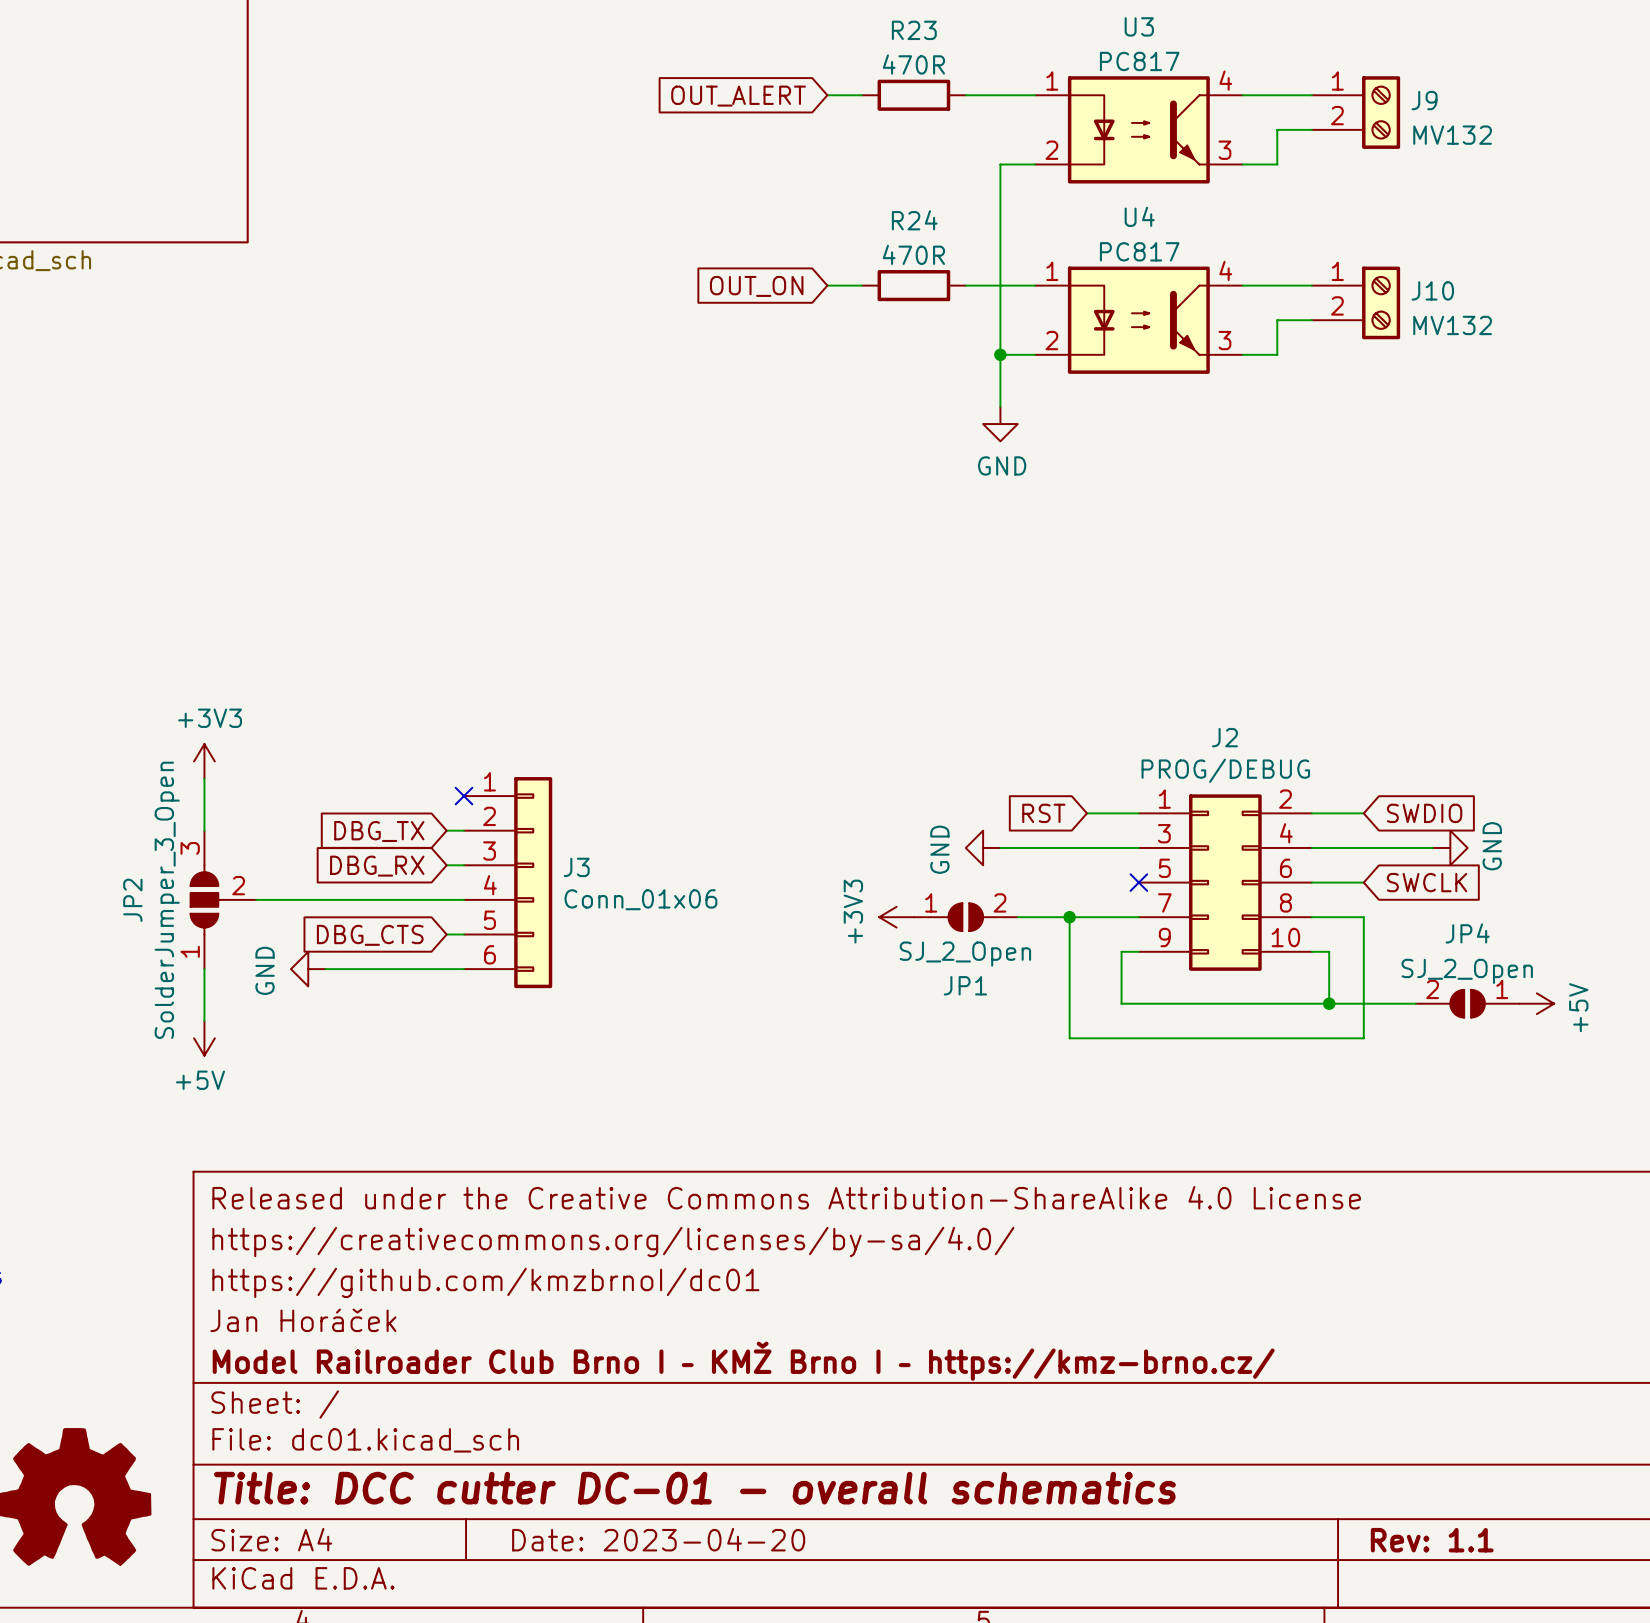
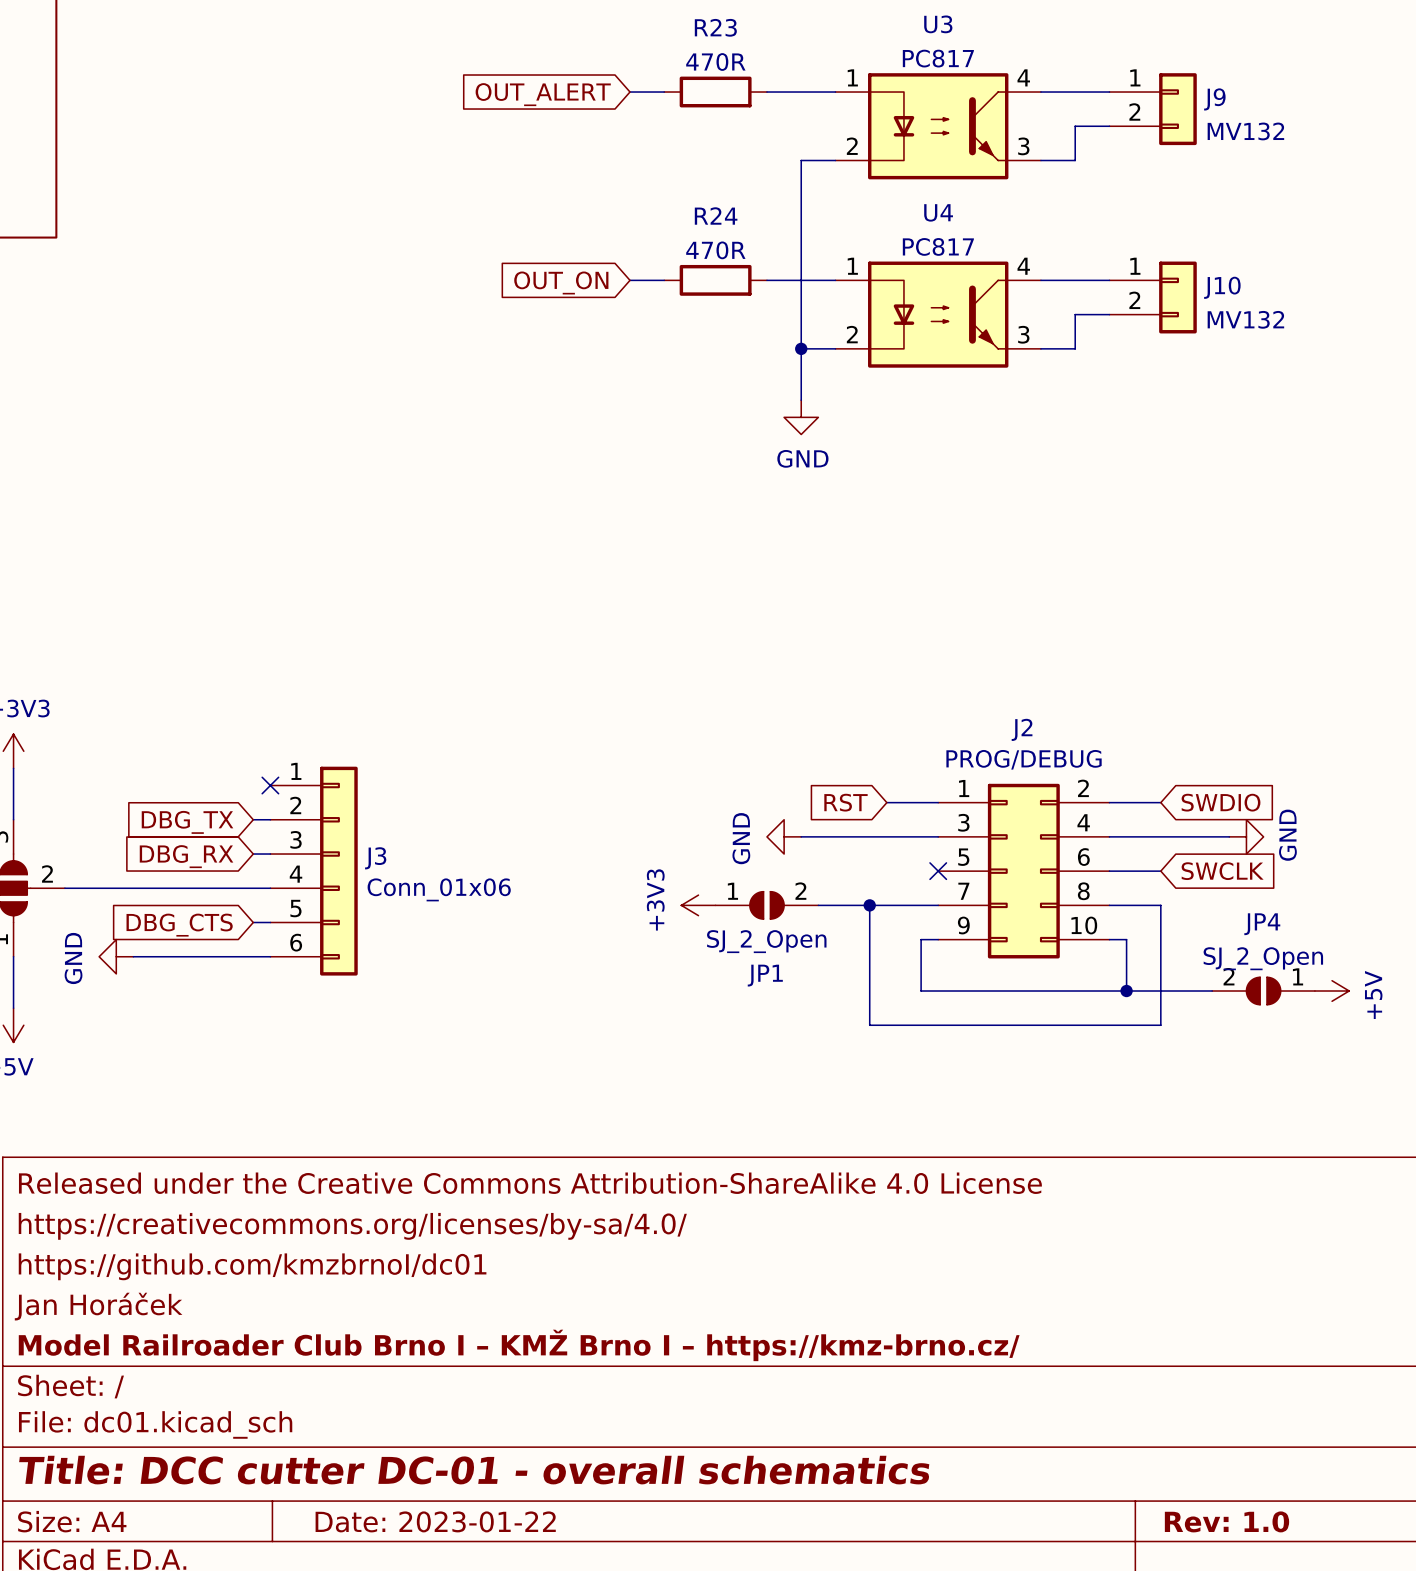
J9 symbol: [1311, 76, 1401, 149] -> [1109, 73, 1197, 146]
J10 symbol: [1311, 266, 1401, 340] -> [1109, 261, 1197, 334]
title block: Date: 2023-04-20 (658, 1539) -> Date: 2023-01-22 (435, 1521)
title block: Rev: 1.1 (1432, 1540) -> Rev: 1.0 (1227, 1521)

